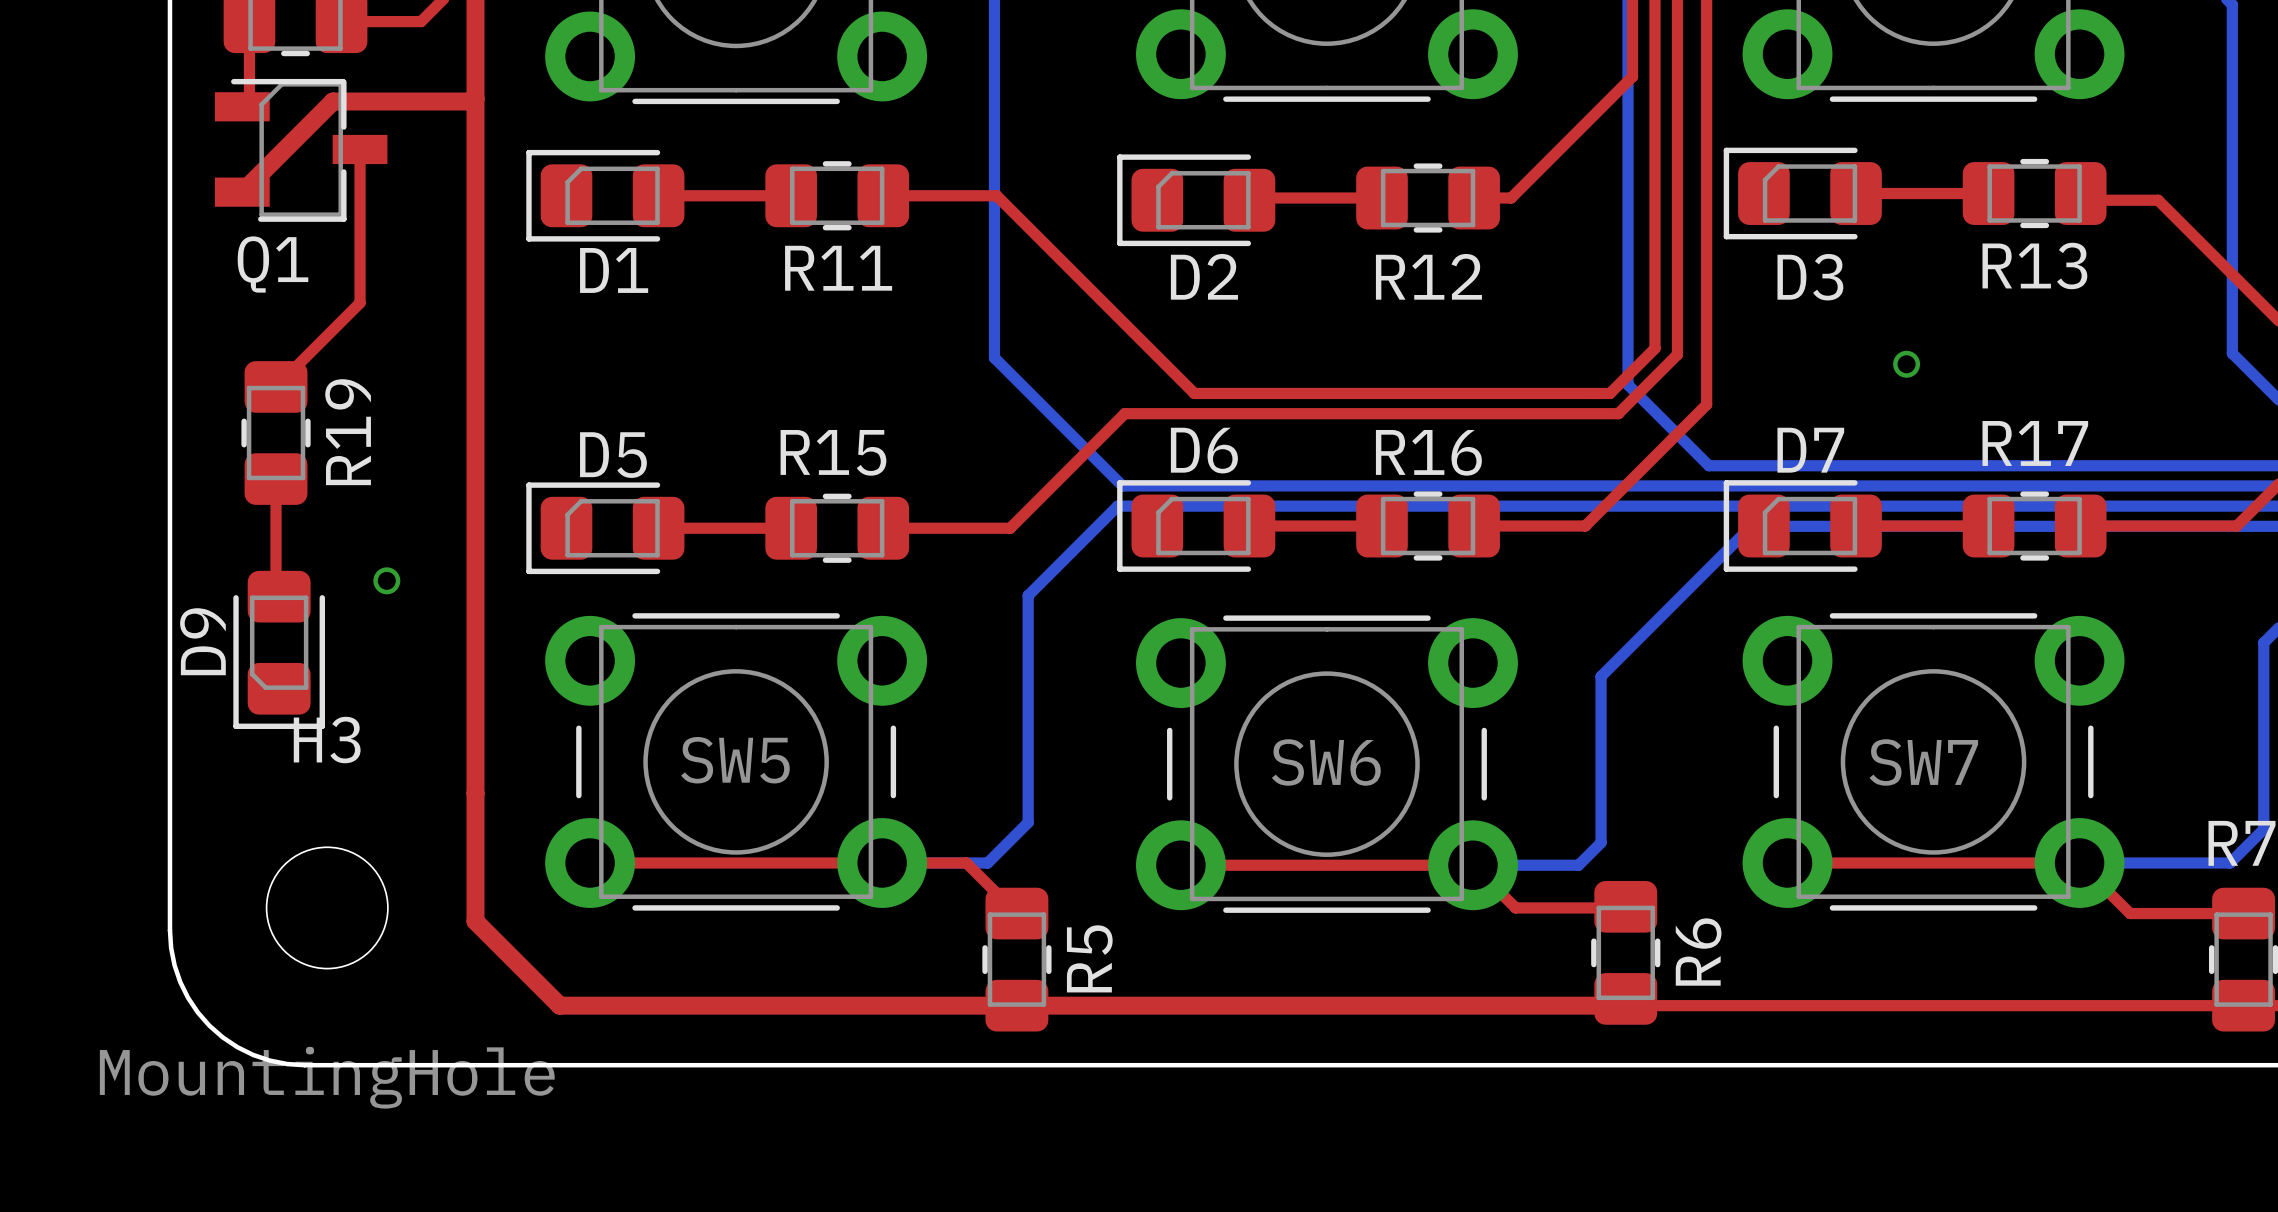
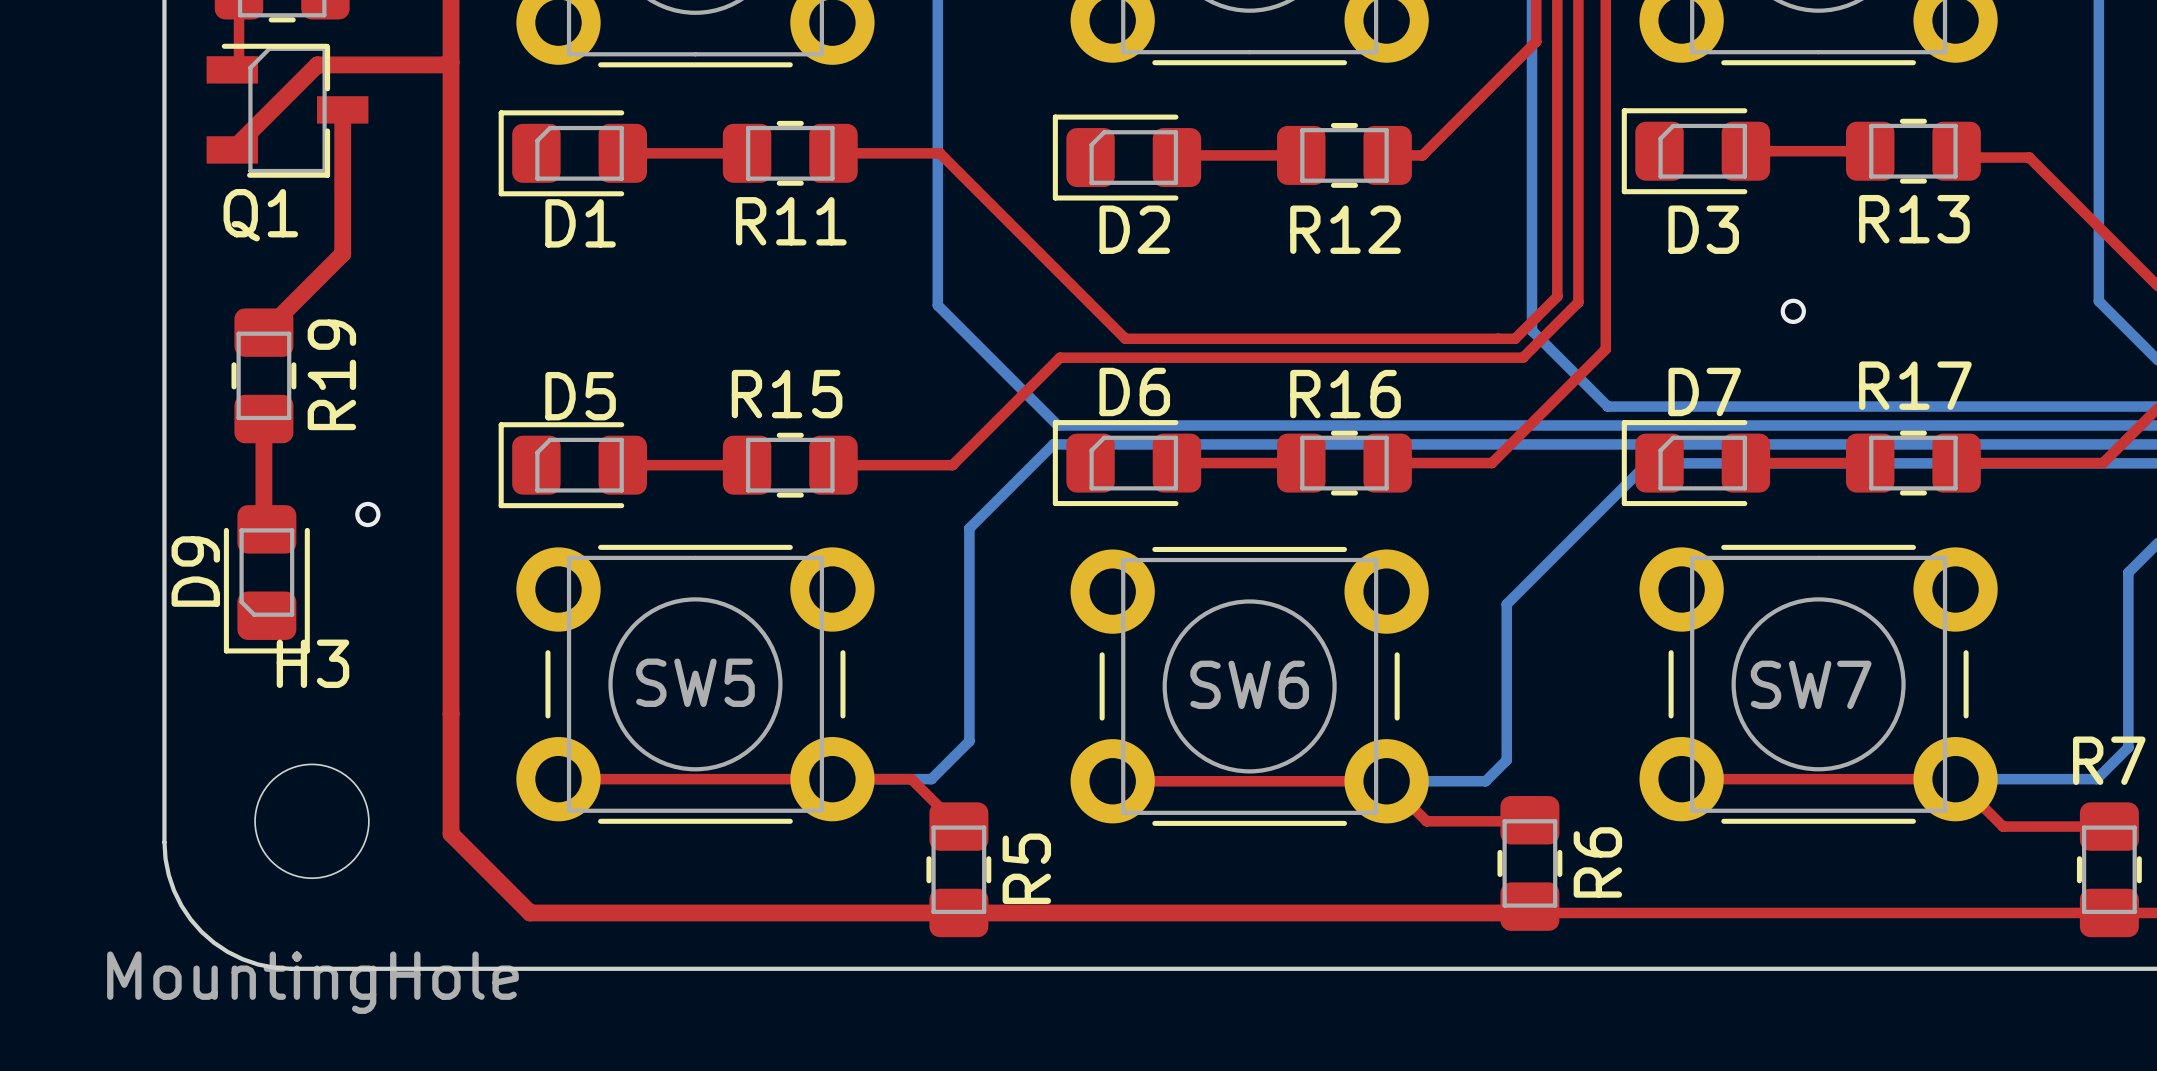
top track width: thin (360, 149) (360, 302) (276, 386) -> thick (342, 109) (342, 253) (263, 332)
top track width: thin (276, 479) (276, 593) -> thick (263, 419) (263, 526)

